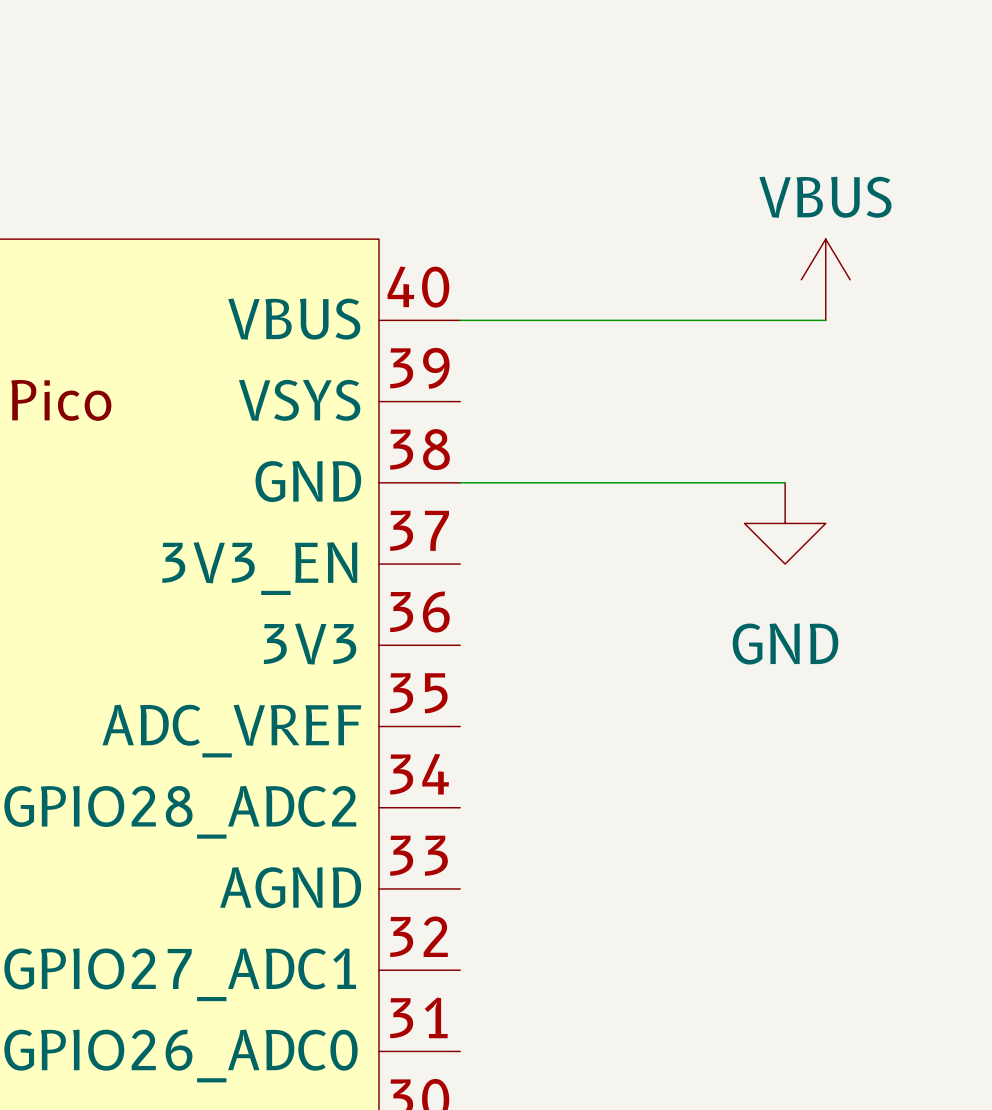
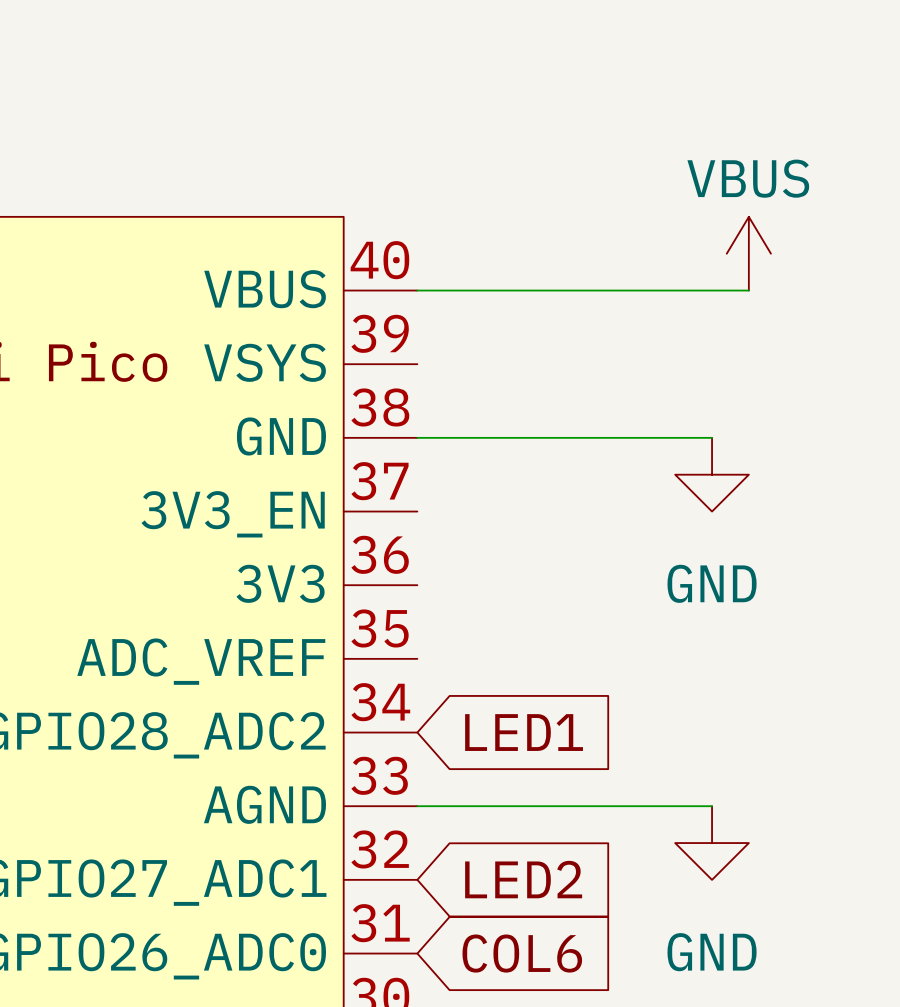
global label: none -> LED1 (524, 732)
wire: none -> (417, 806) (712, 806)
power symbol: none -> GND (712, 843)
global label: none -> LED2 (523, 879)
global label: none -> COL6 (522, 953)

